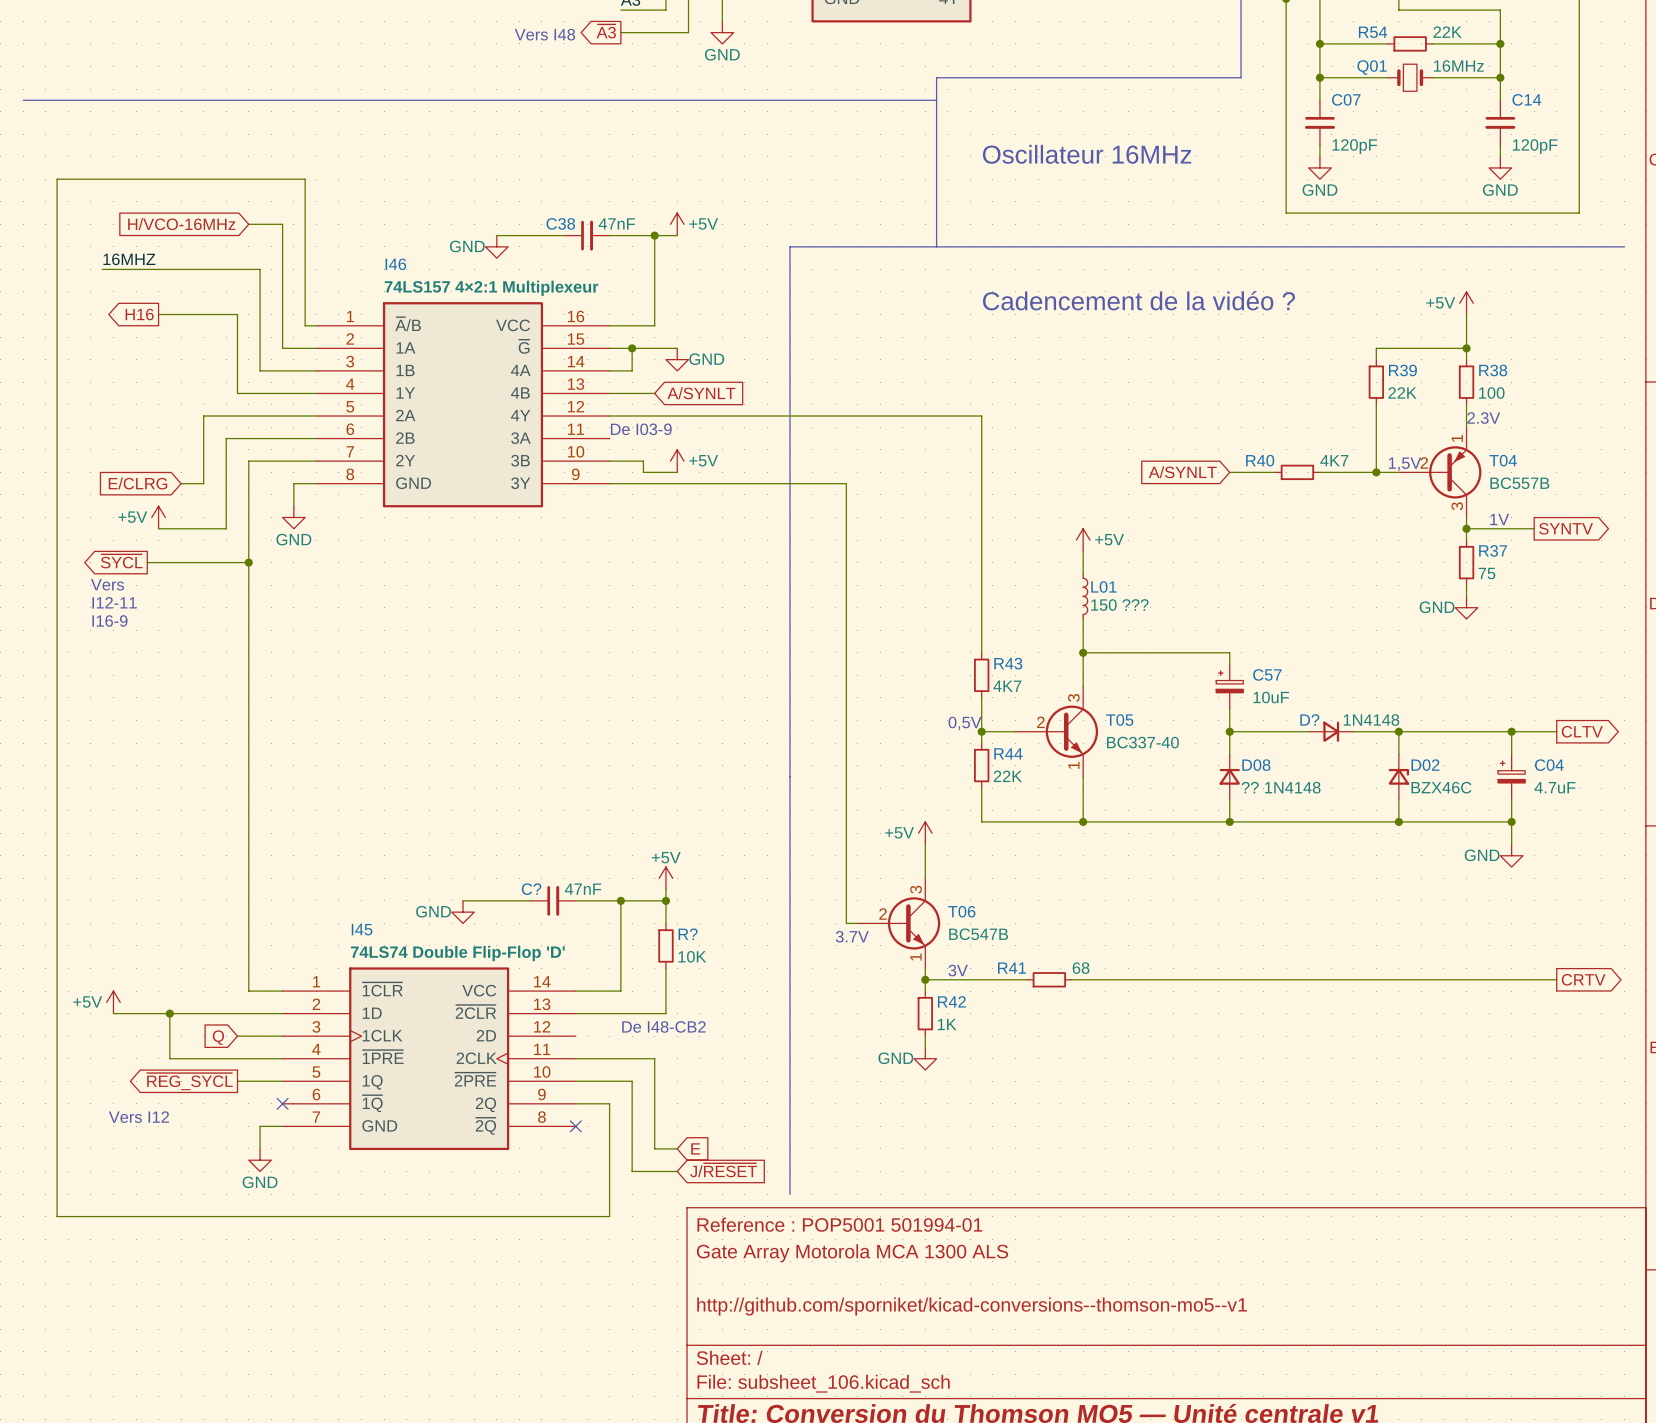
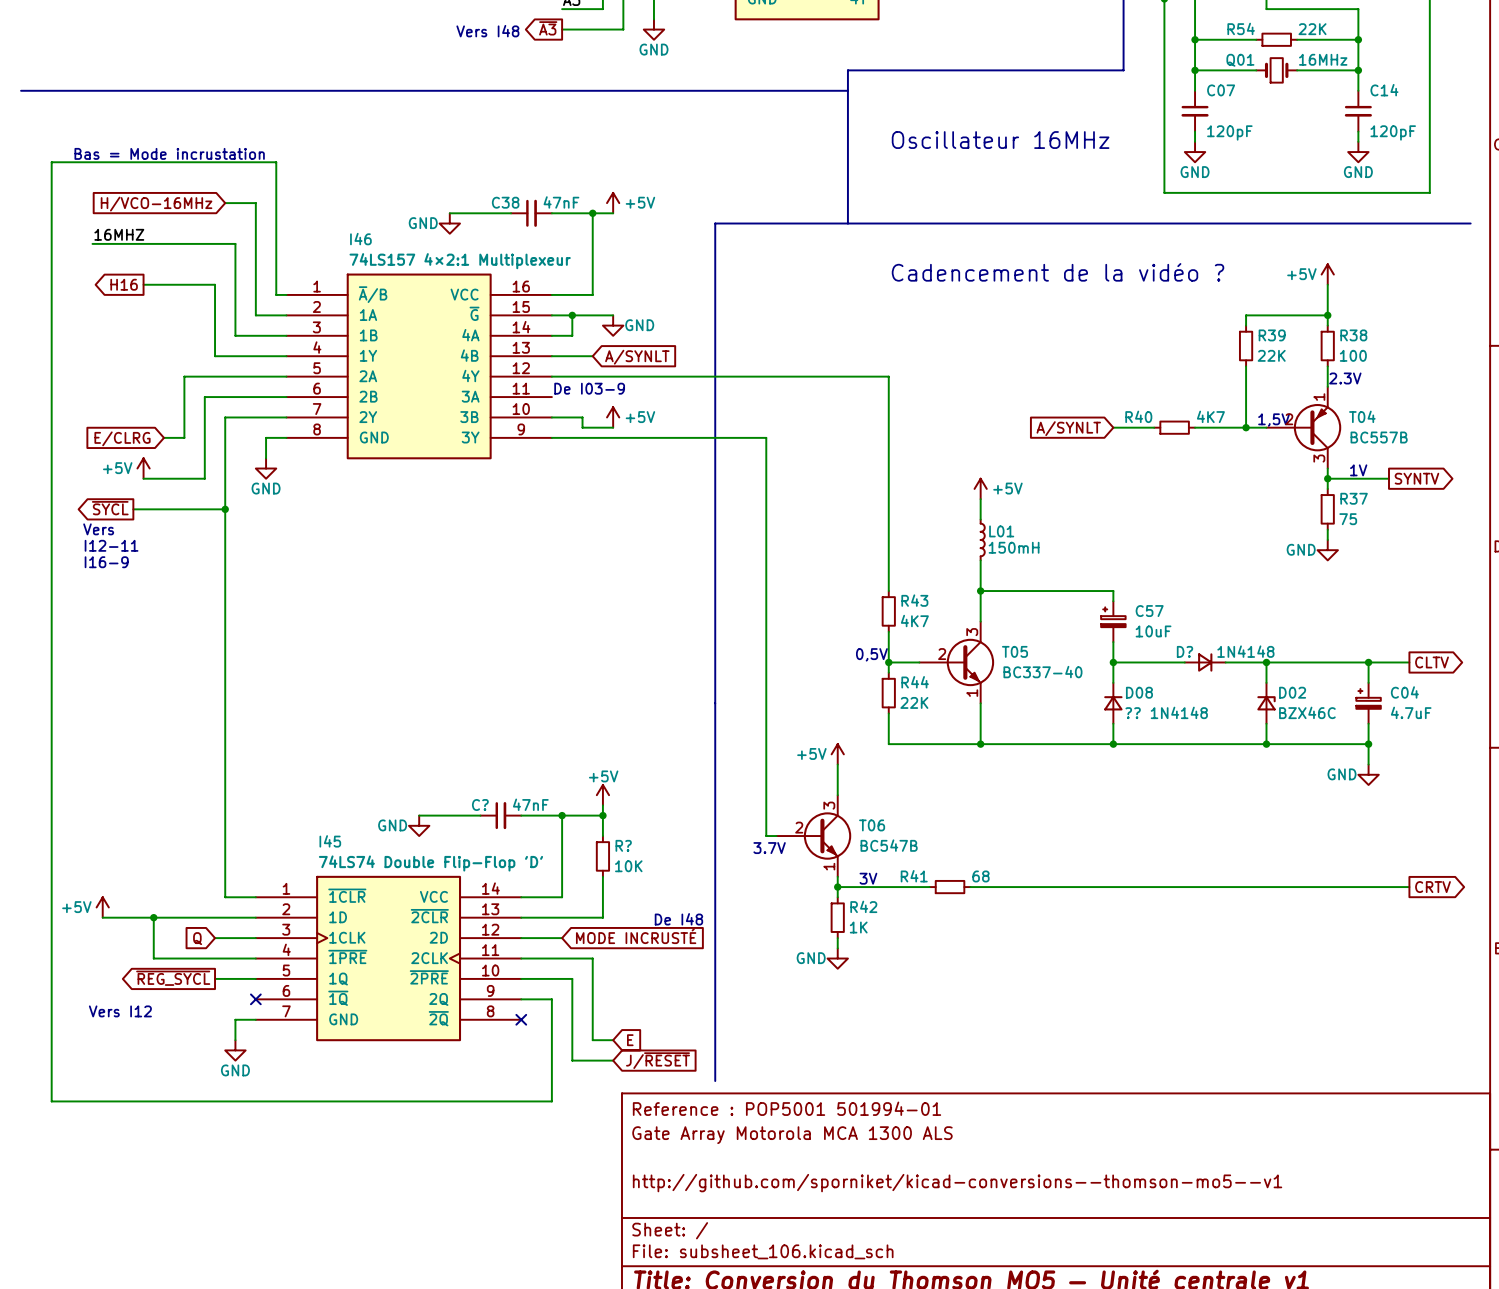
text: none -> Bas = Mode incrustation (169, 153)
L01 value: 150 ??? (1119, 605) -> 150mH (1014, 547)
text: De I48-CB2 (663, 1026) -> De I48 (678, 919)
global label: none -> MODE INCRUSTÉ (636, 936)
wire: none -> (521, 938) (562, 938)

